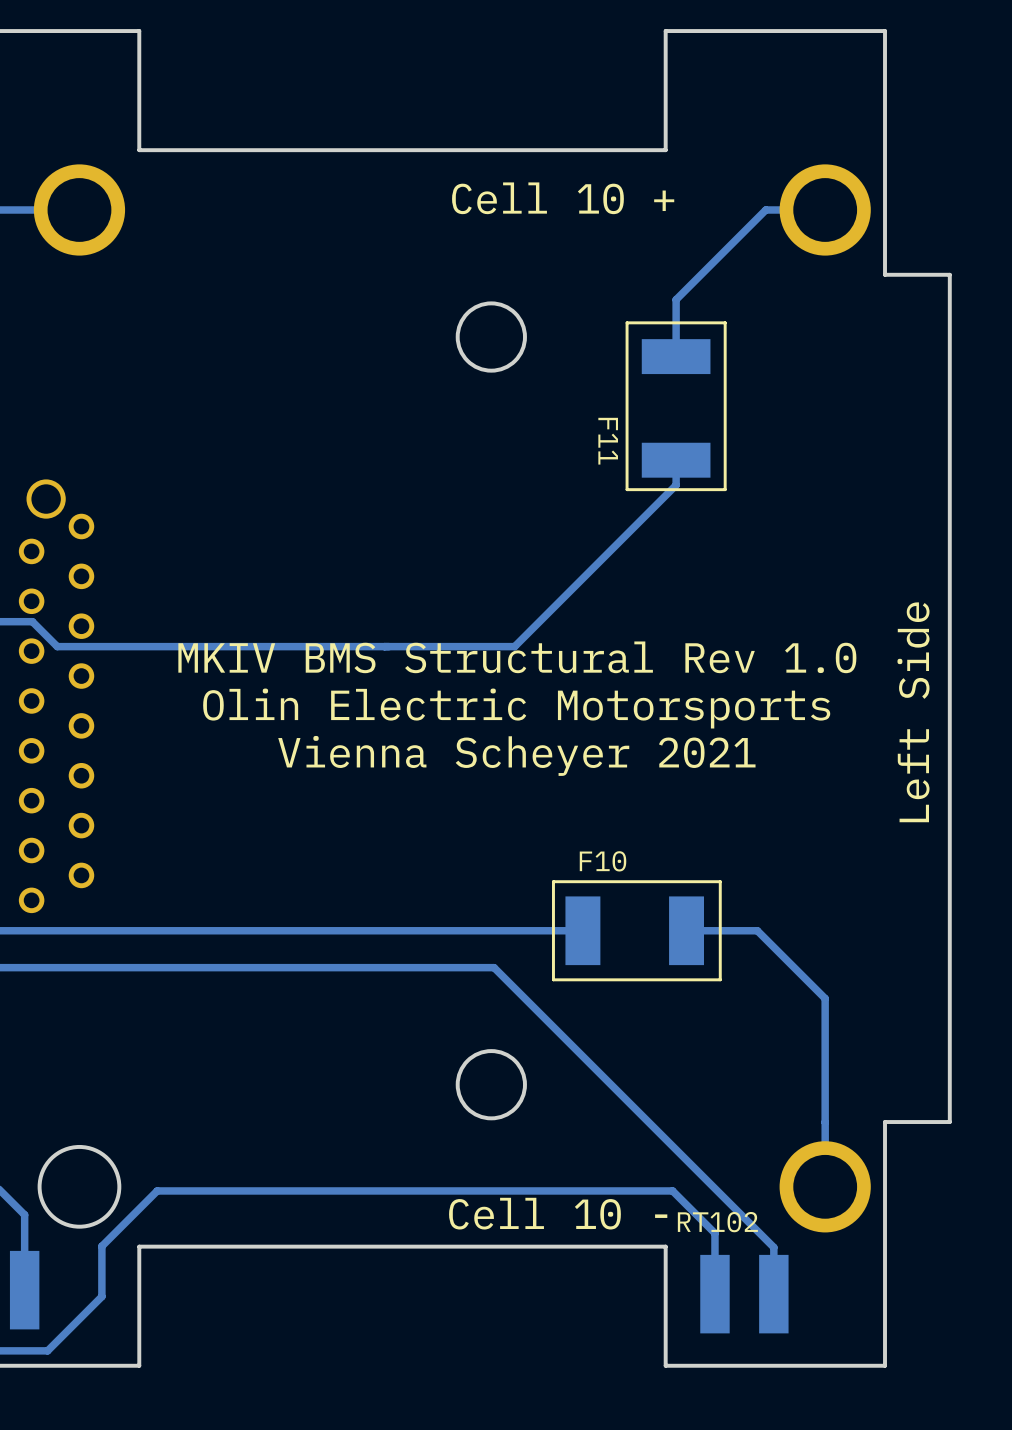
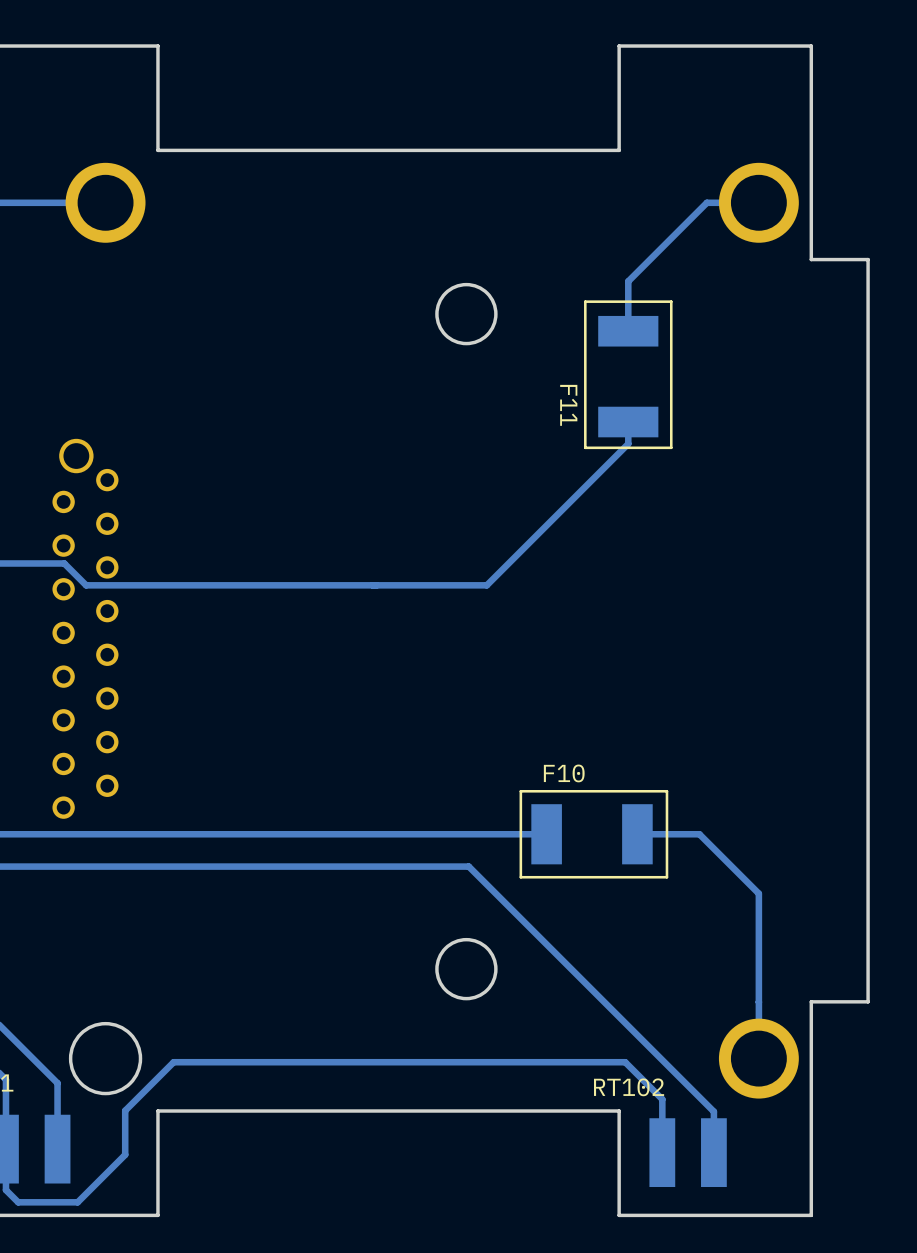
text: Cell 10 + (563, 198) -> none
text: MKIV BMS Structural Rev 1.0 (517, 657) -> none
text: Olin Electric Motorsports (516, 708) -> none
text: Left Side (913, 712) -> none
text: Vienna Scheyer 2021 (516, 755) -> none
text: Cell 10 - (558, 1213) -> none
RT102 name position: RT102 (717, 1222) -> RT102 (629, 1087)

